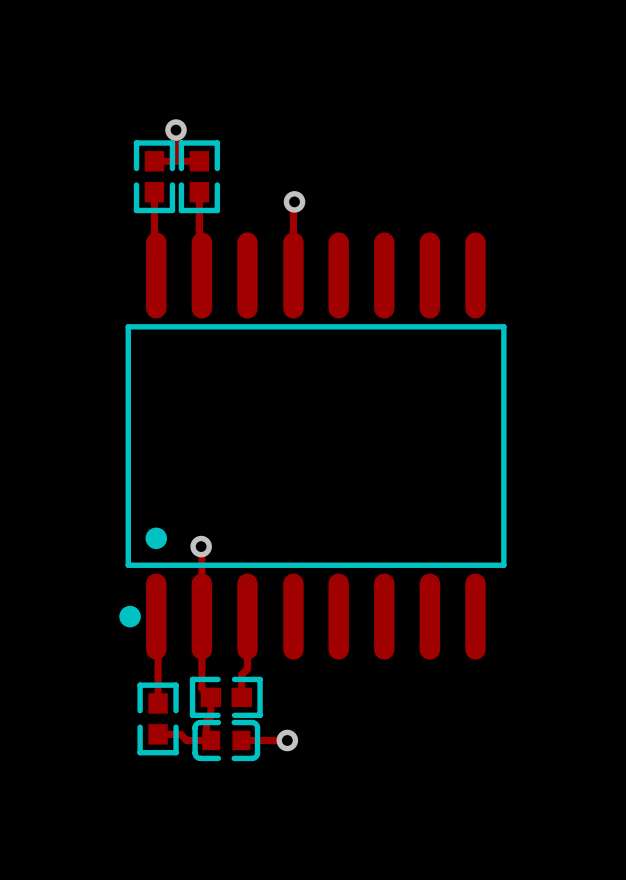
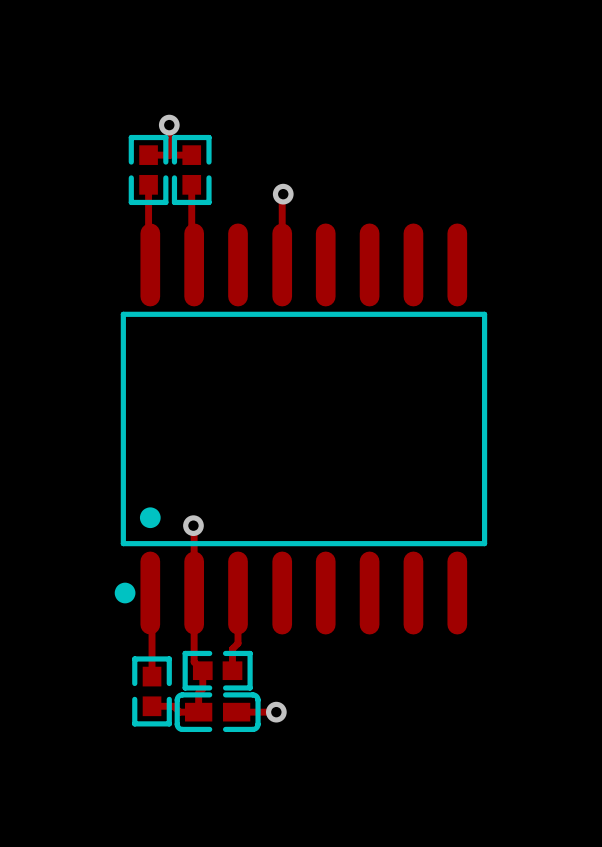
part footprint: [192, 719, 261, 762] -> [174, 692, 261, 733]

